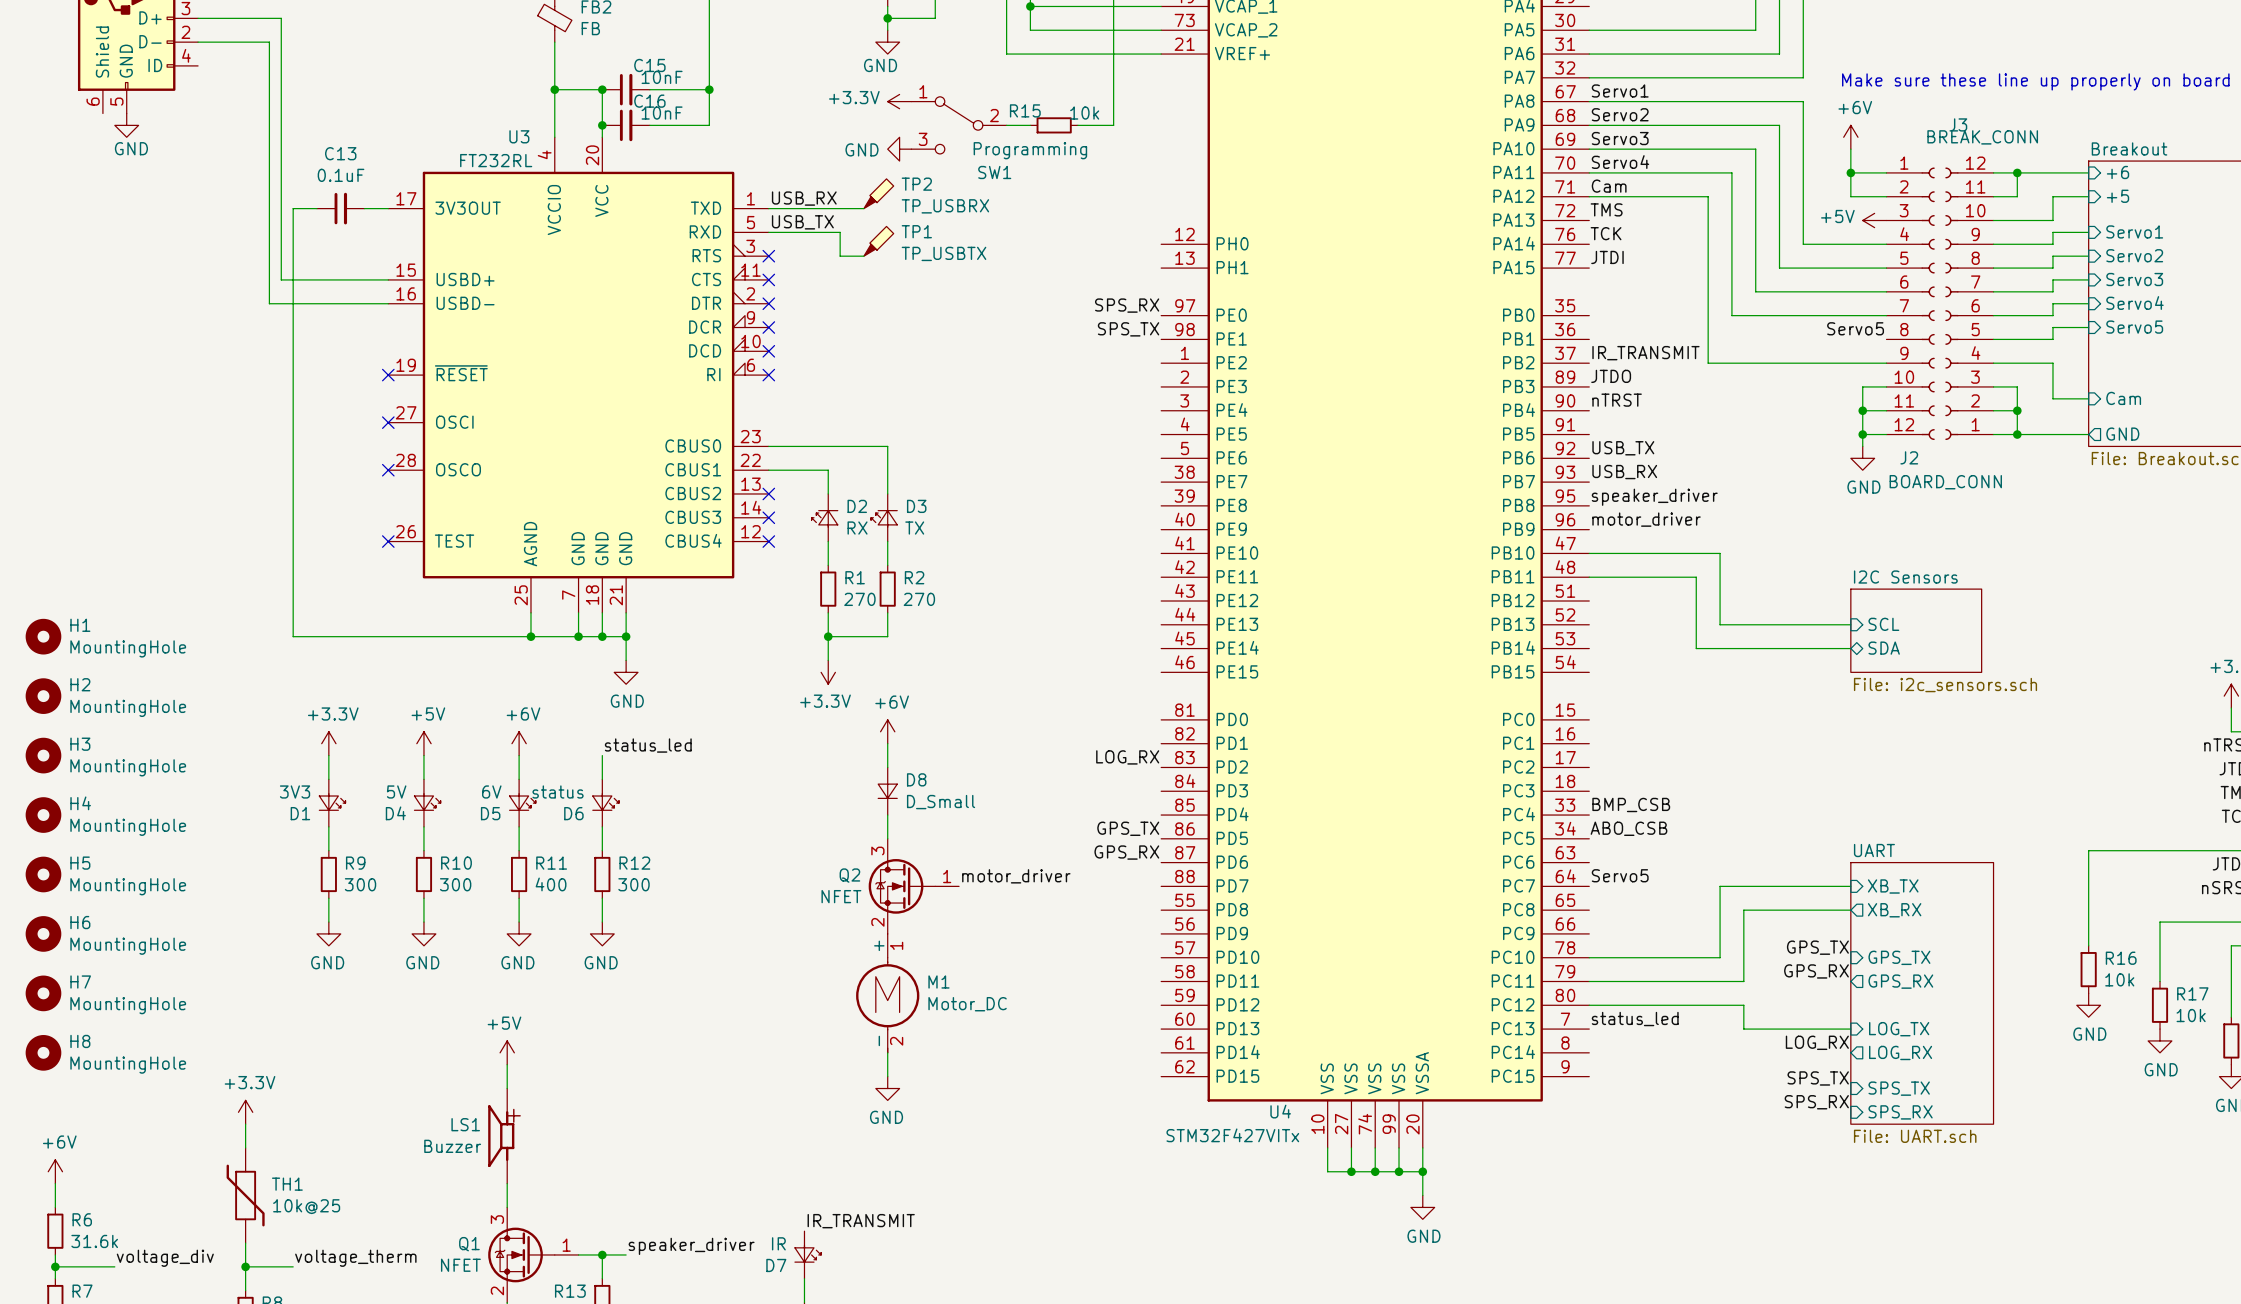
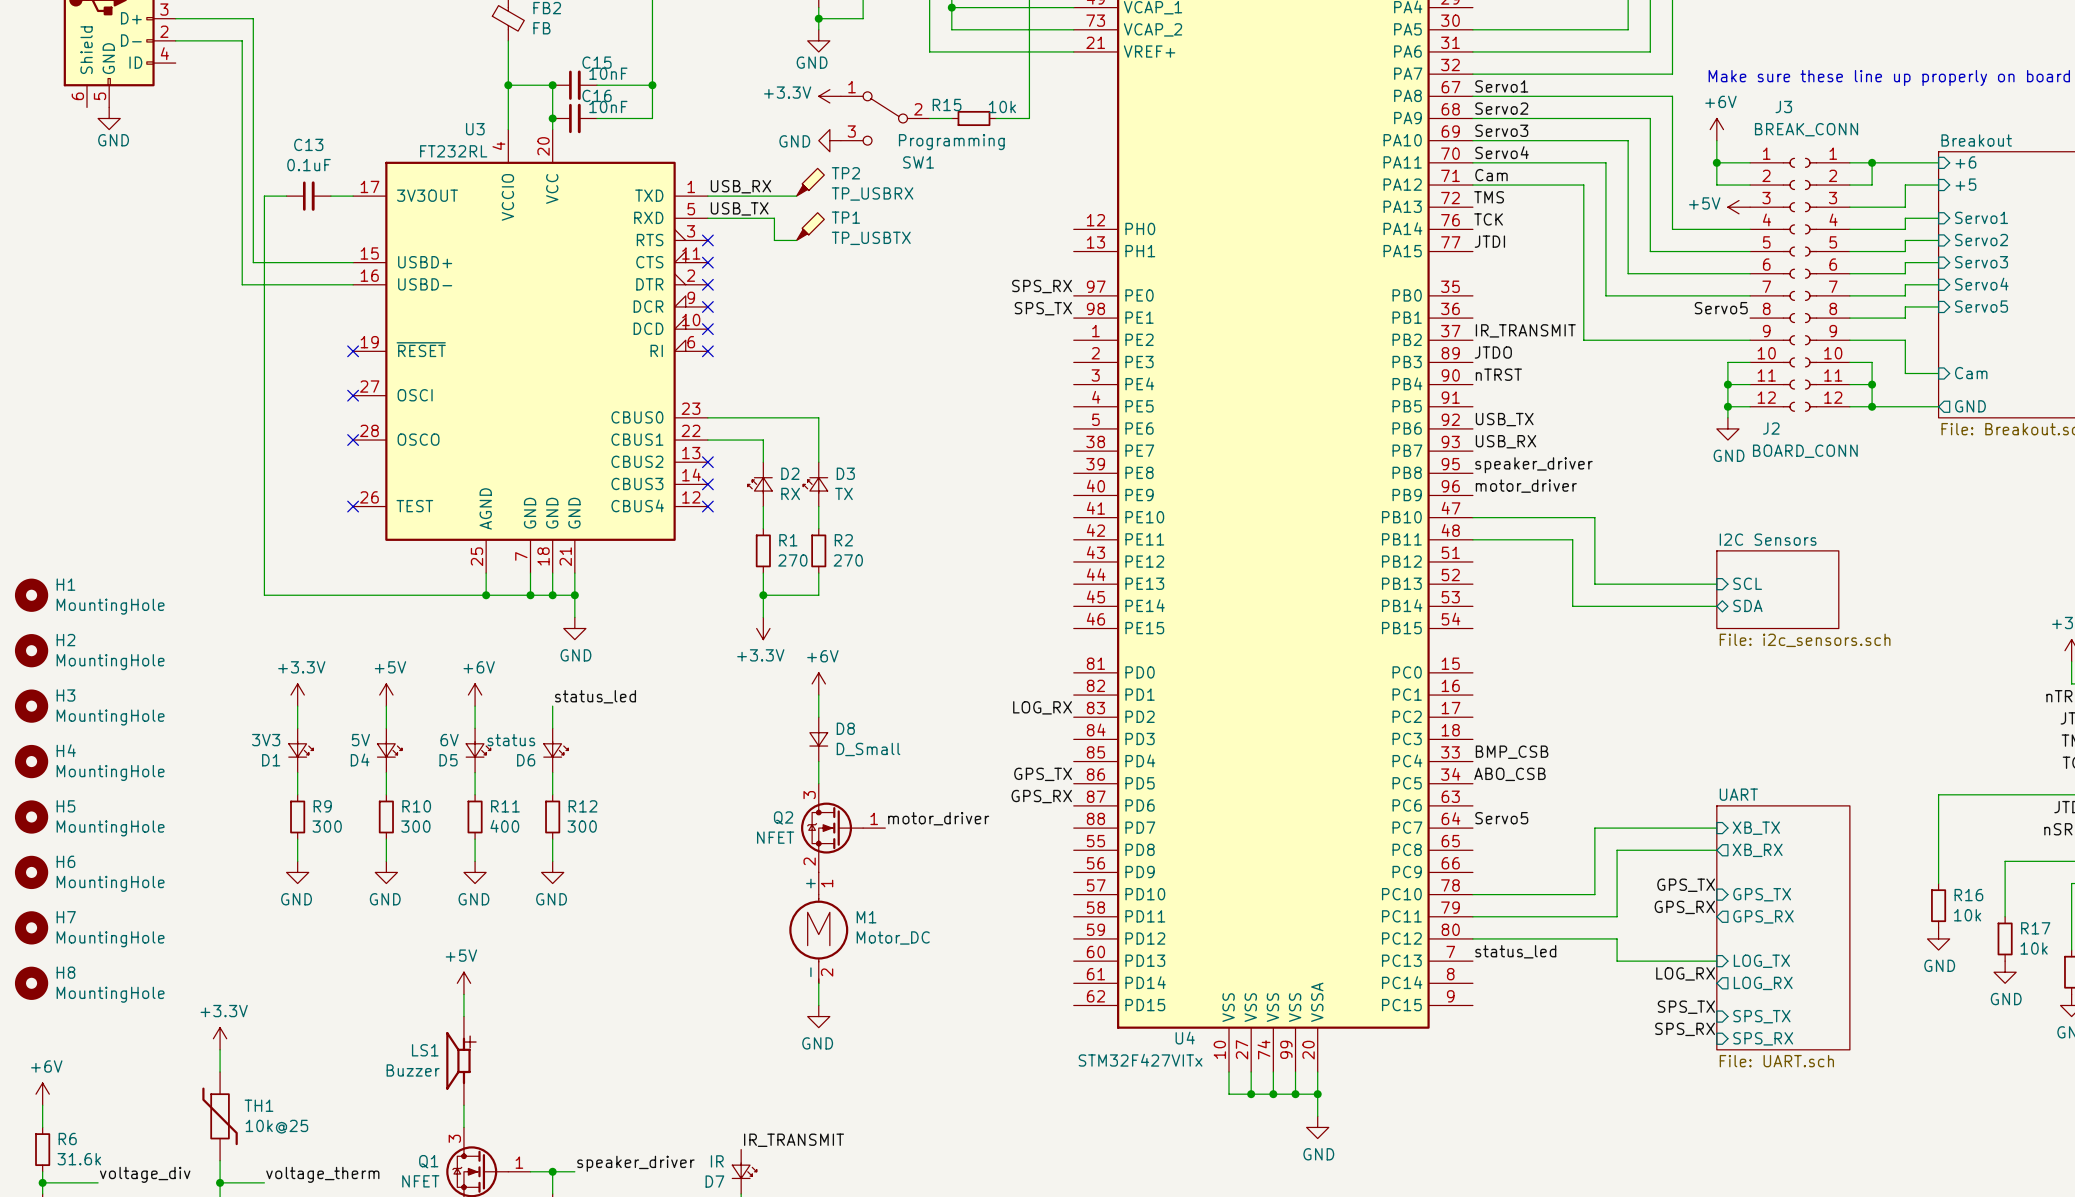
J3 name position: J3 (1958, 124) -> J3 (1783, 106)
J3 value position: BREAK_CONN (1982, 137) -> BREAK_CONN (1806, 129)
J3 flip: as is (1951, 303) -> up-down (1811, 284)

